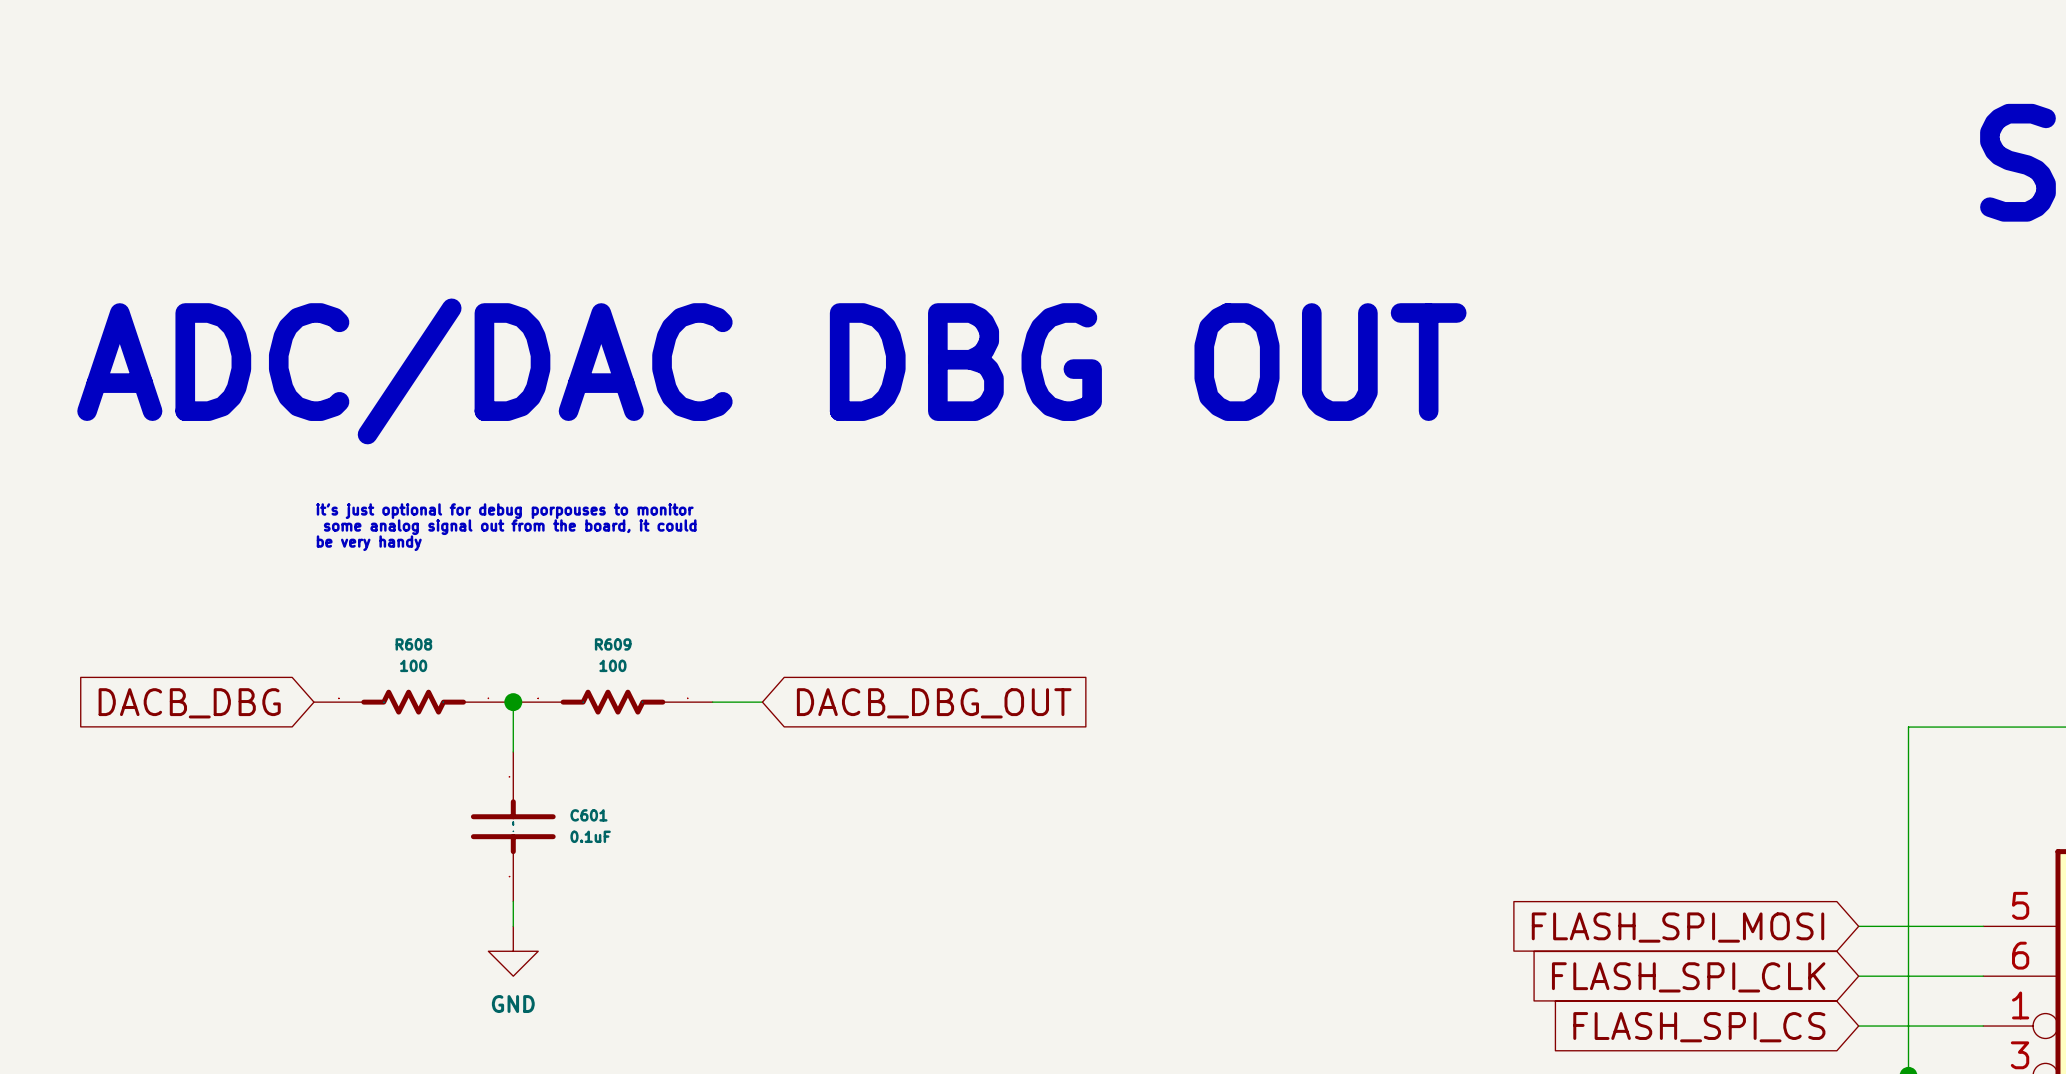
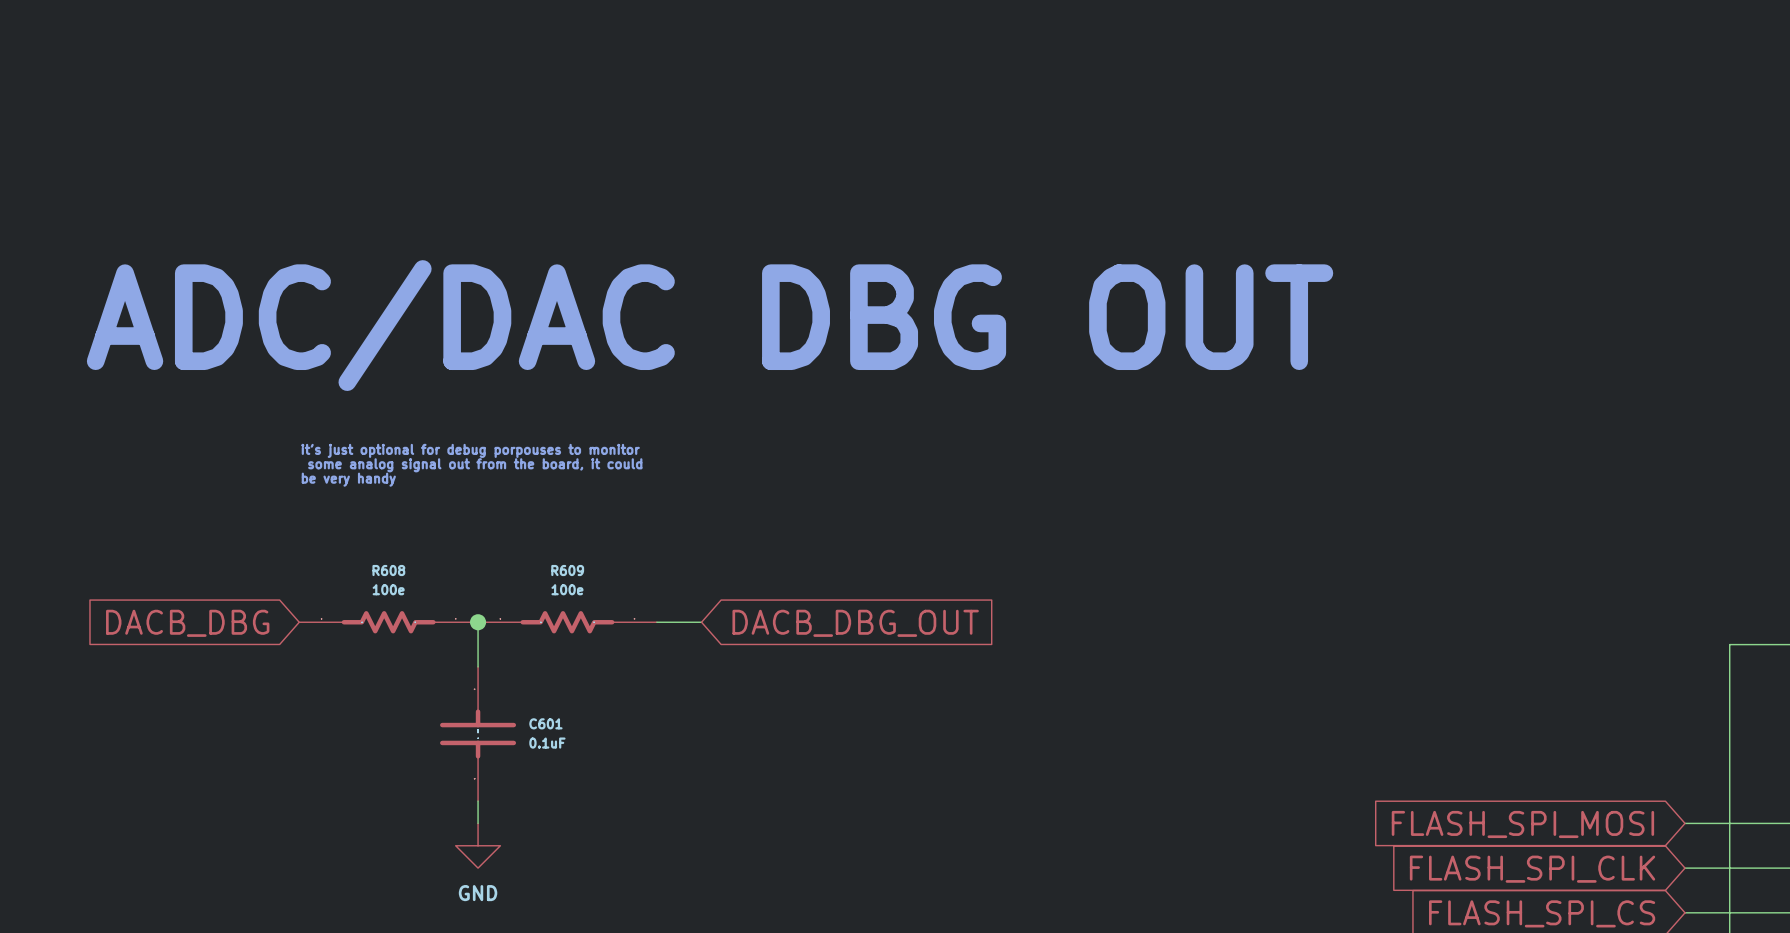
R608 value: 100 (413, 665) -> 100e (388, 589)
R609 value: 100 (612, 665) -> 100e (567, 589)

